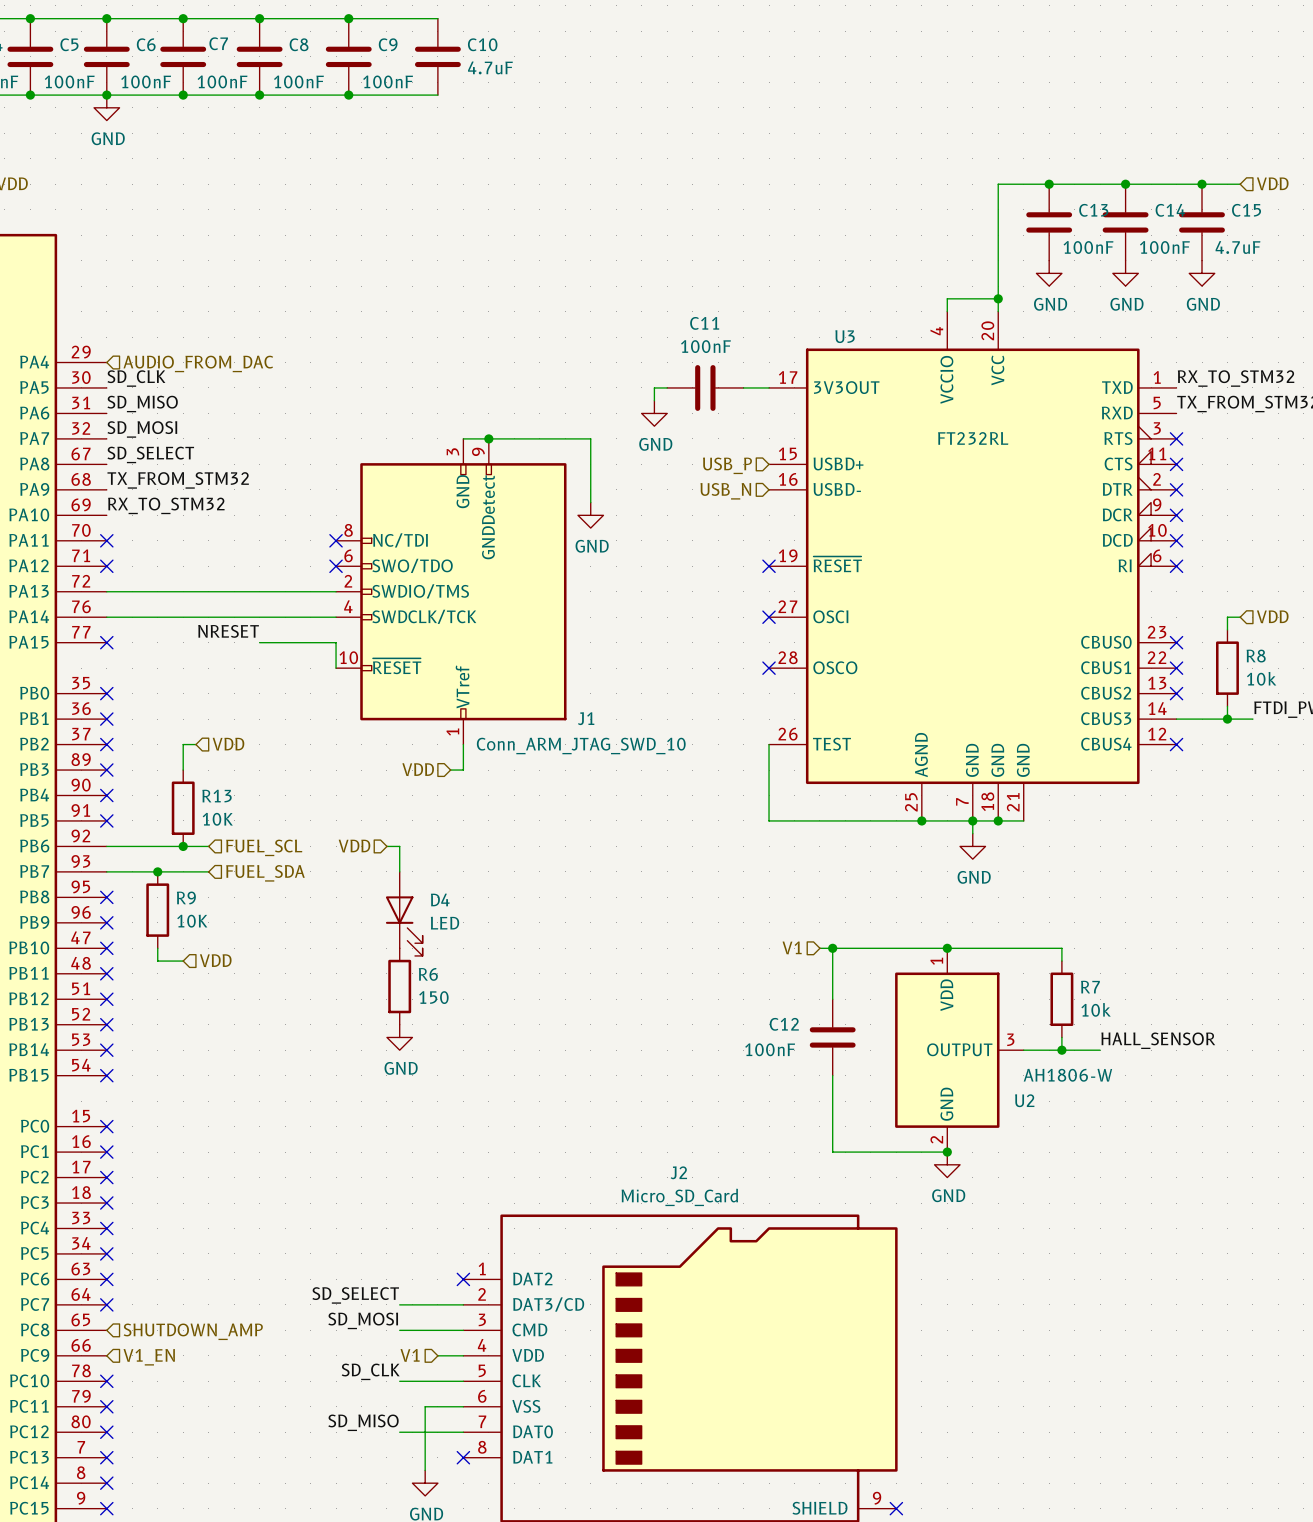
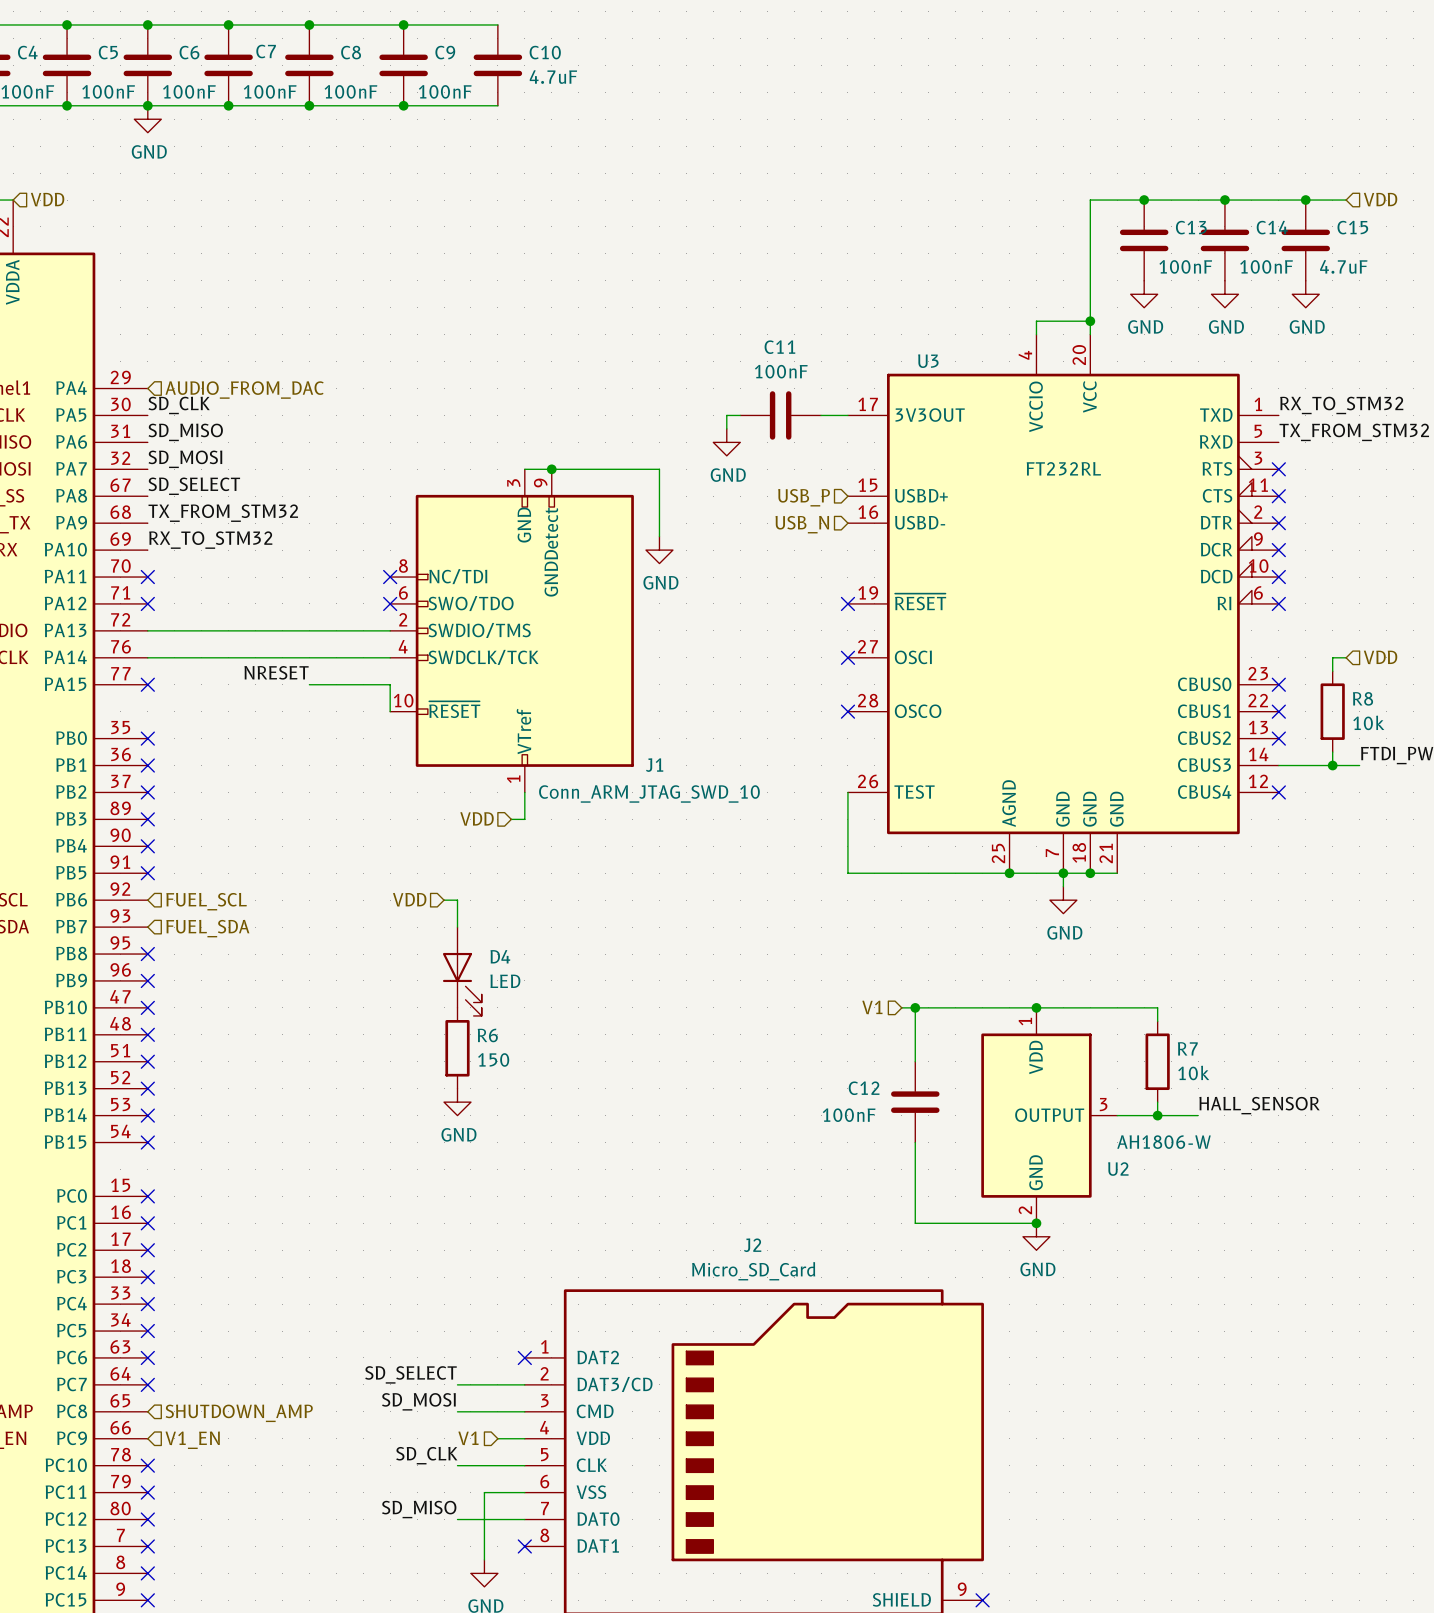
wire: (195, 744) (183, 744) (183, 770) -> none
hierarchical label: VDD (228, 744) -> none
R13: 10K (183, 808) -> none
wire: (106, 846) (208, 846) -> none
junction: (183, 846) -> none
hierarchical label position: FUEL_SCL (264, 847) -> FUEL_SCL (206, 901)
wire: (106, 871) (208, 871) -> none
junction: (157, 871) -> none
hierarchical label position: FUEL_SDA (265, 873) -> FUEL_SDA (207, 928)
R9: 10K (157, 910) -> none
wire: (157, 948) (157, 961) (183, 961) -> none
hierarchical label: VDD (215, 960) -> none

